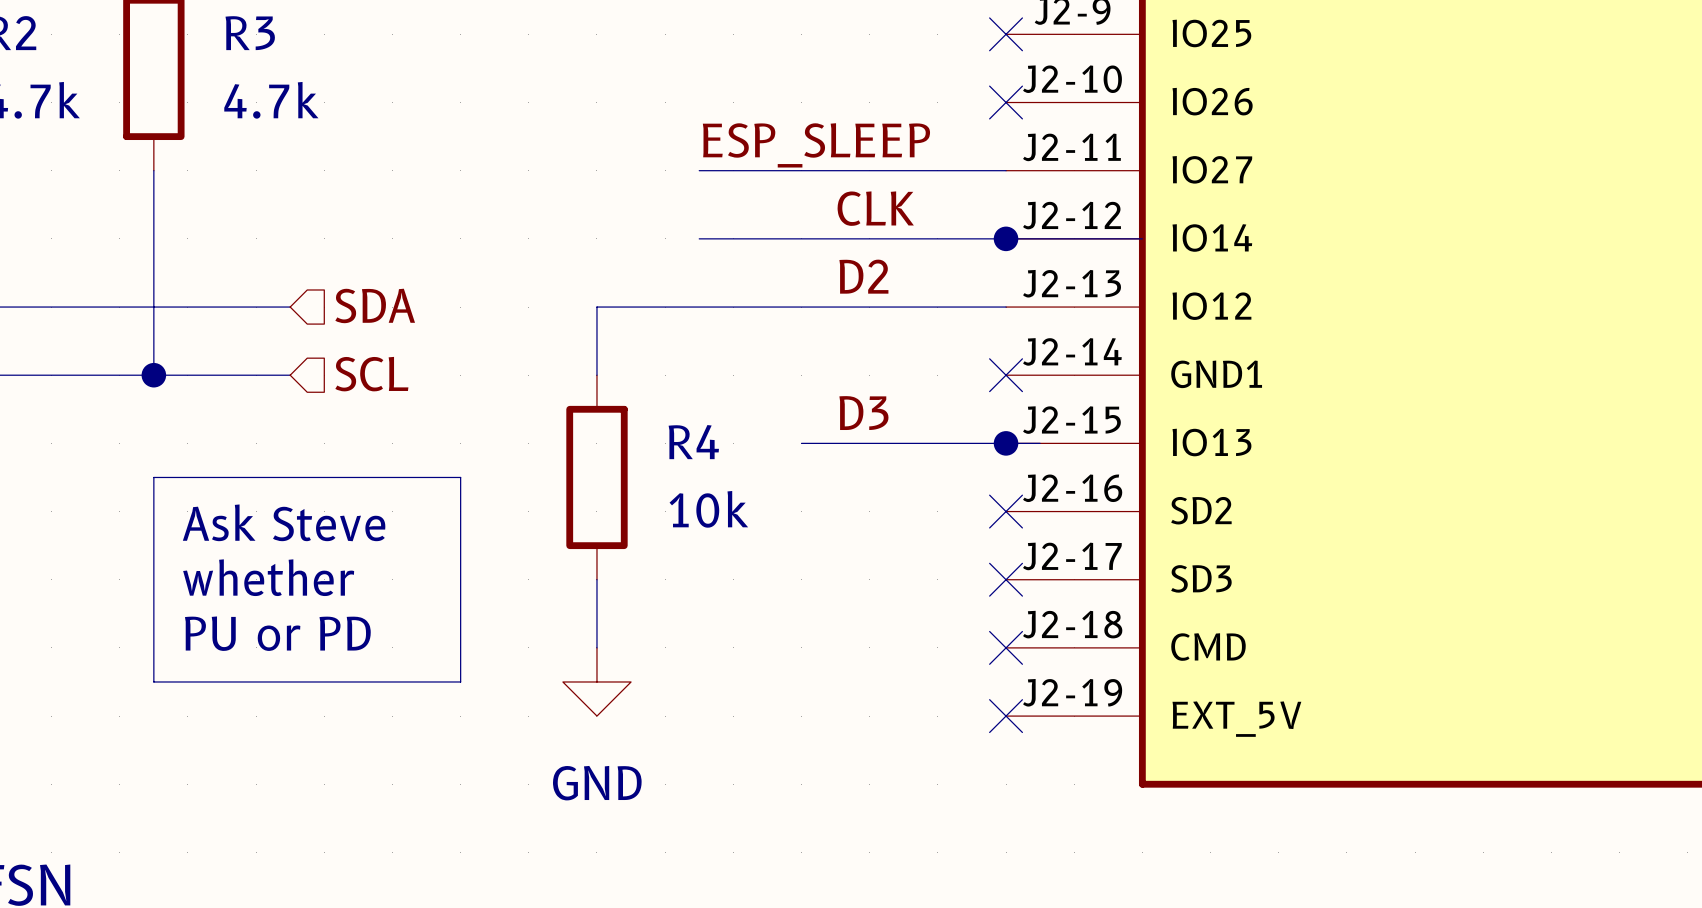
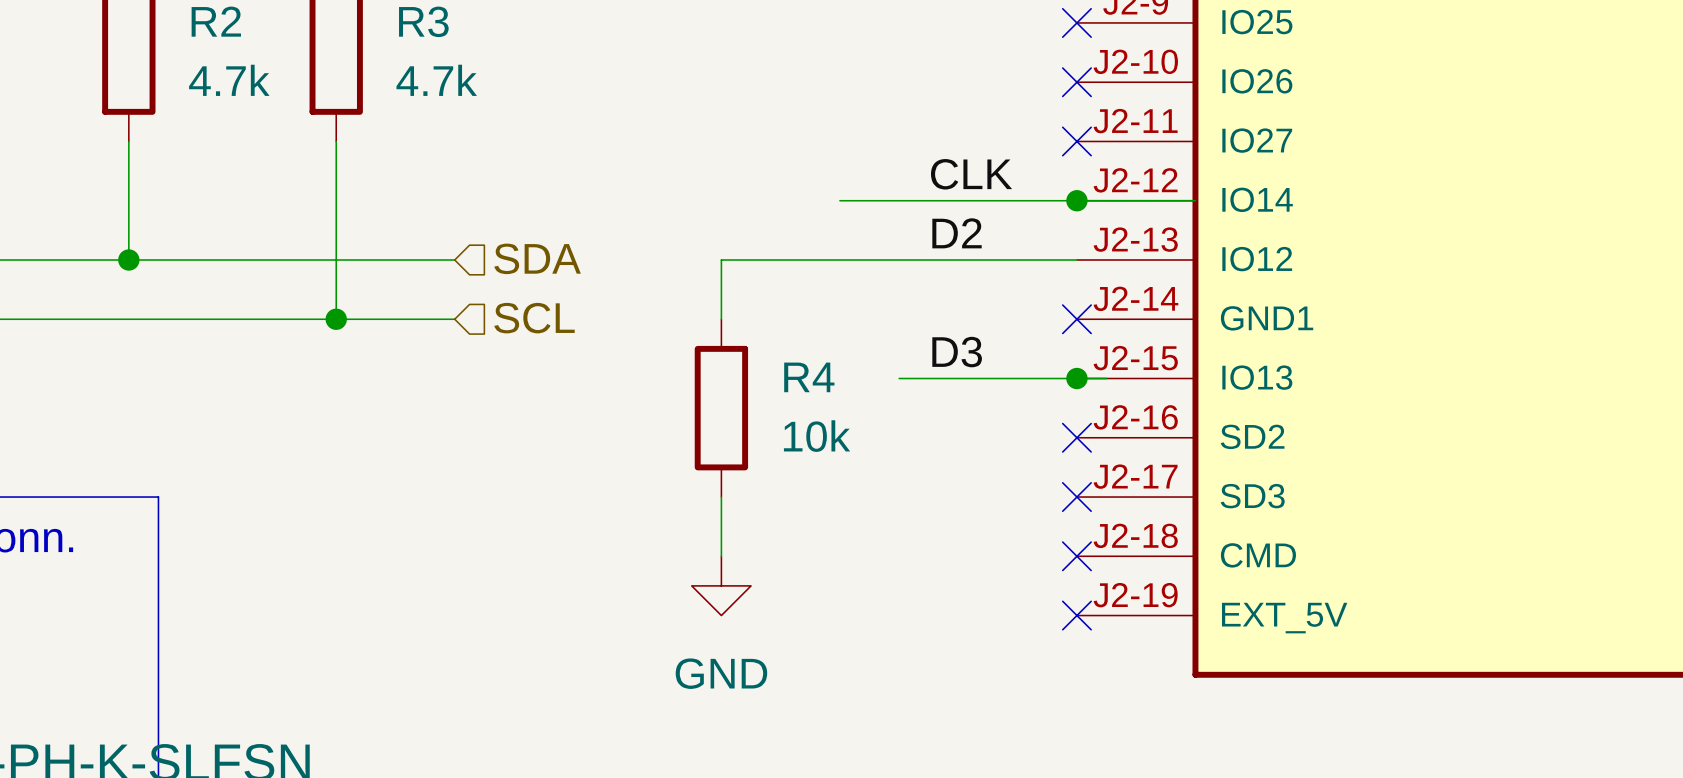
label: ESP_SLEEP (816, 145) -> none
wire: (699, 170) (1006, 170) -> none
no-connect mark: none -> (1076, 141)
wire: (699, 238) (733, 238) -> none
line: (153, 477) (460, 477) (460, 681) (153, 681) (153, 477) -> none
text: Ask Steve (284, 522) -> none
text: whether (268, 577) -> none
text: PU or PD (277, 633) -> none

